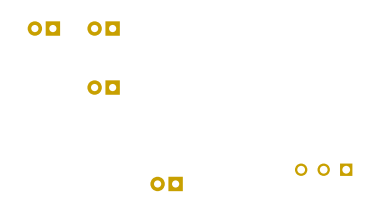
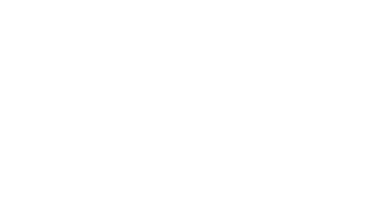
part: (43, 28) -> none
part: (103, 28) -> none
part: (103, 87) -> none
part: (323, 169) -> none
part: (166, 183) -> none

